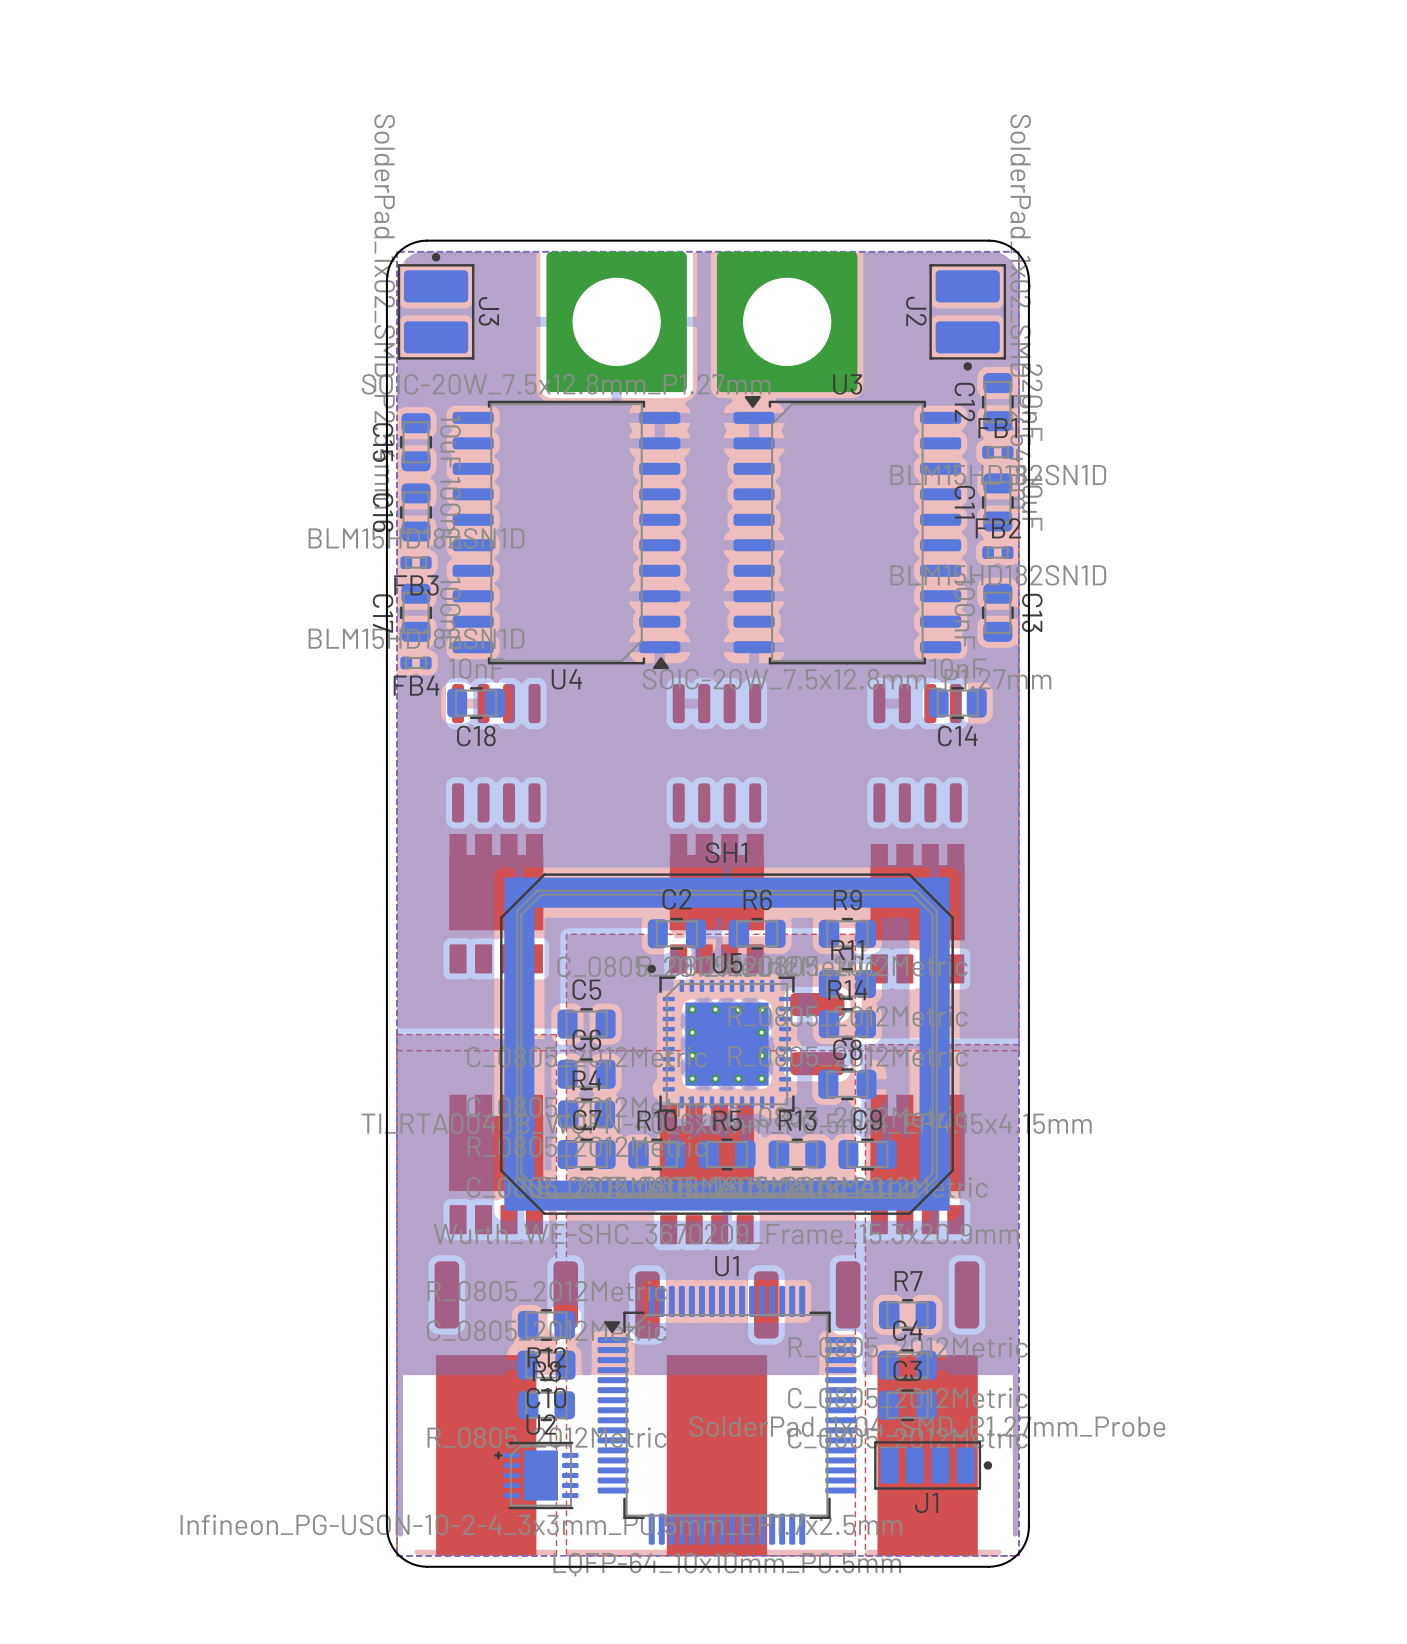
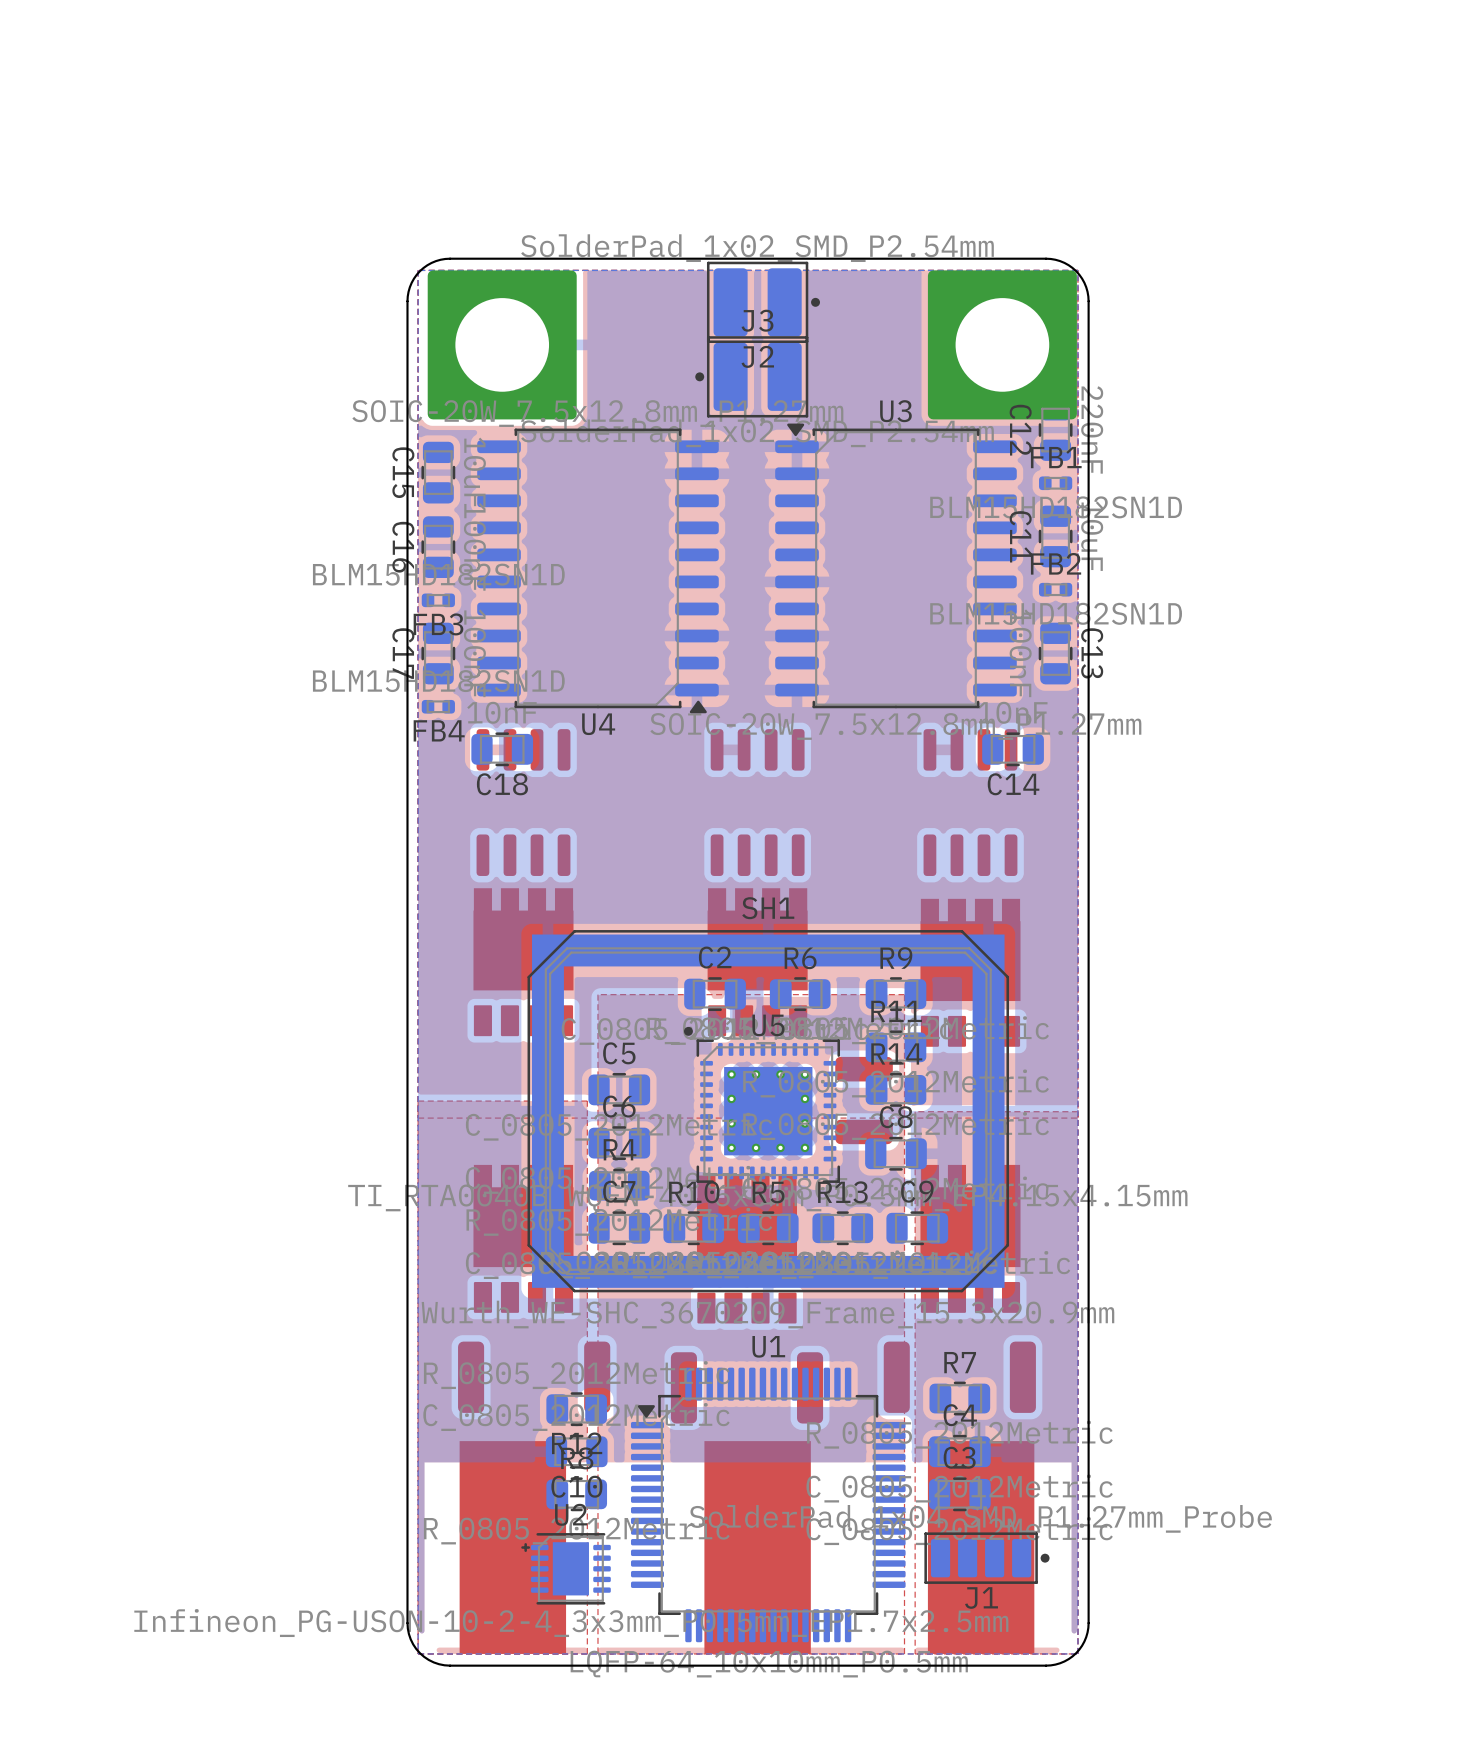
J3 rotation: 0° (436, 306) -> 90° counterclockwise (751, 376)
J3 position: (436, 306) -> (751, 376)
J2 rotation: 0° (967, 317) -> 90° counterclockwise (763, 302)
J2 position: (967, 317) -> (763, 302)
part position: (616, 321) -> (502, 344)
part: (787, 321) -> none
part: none -> (1002, 344)

